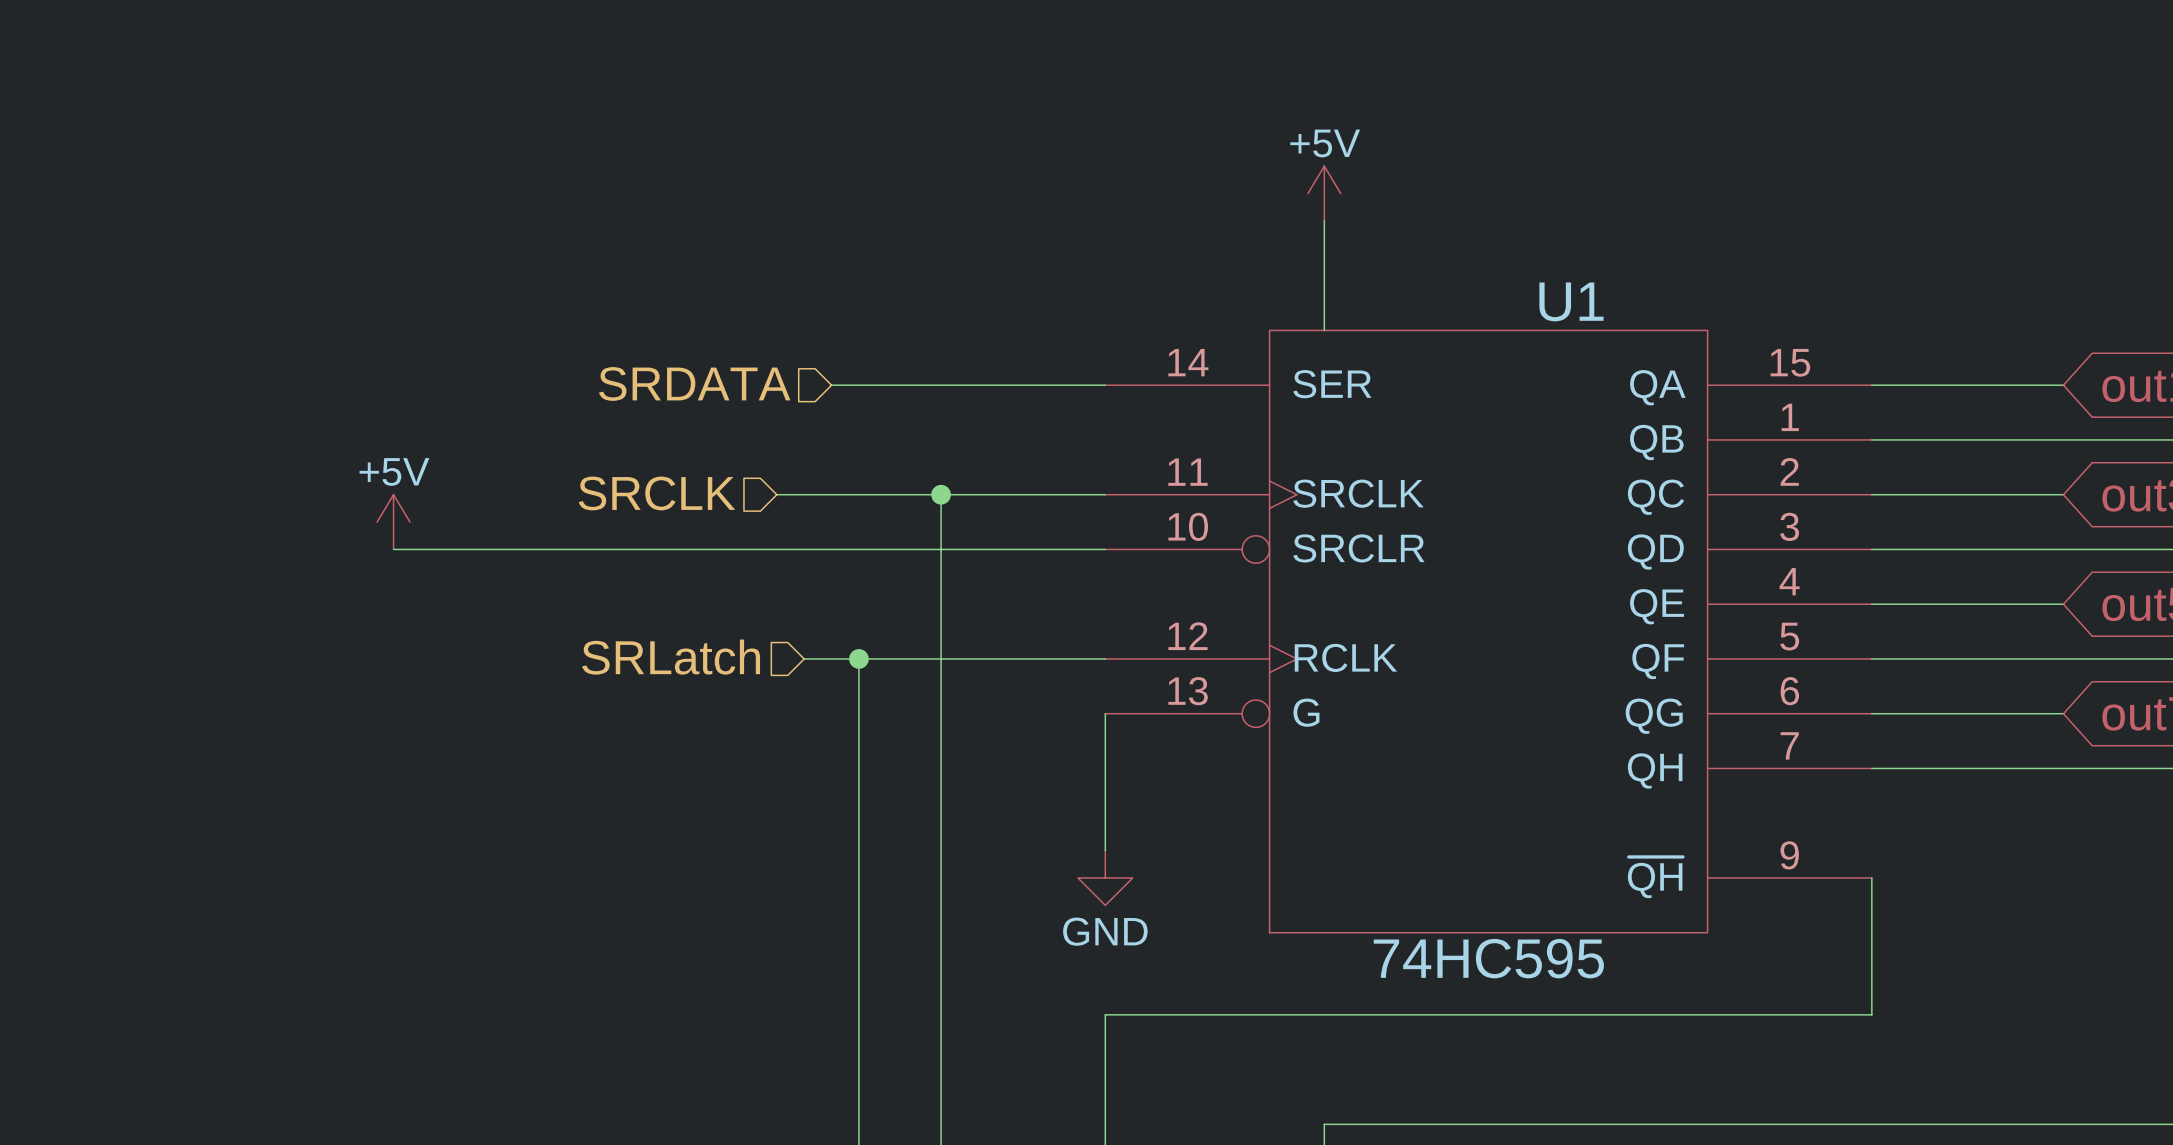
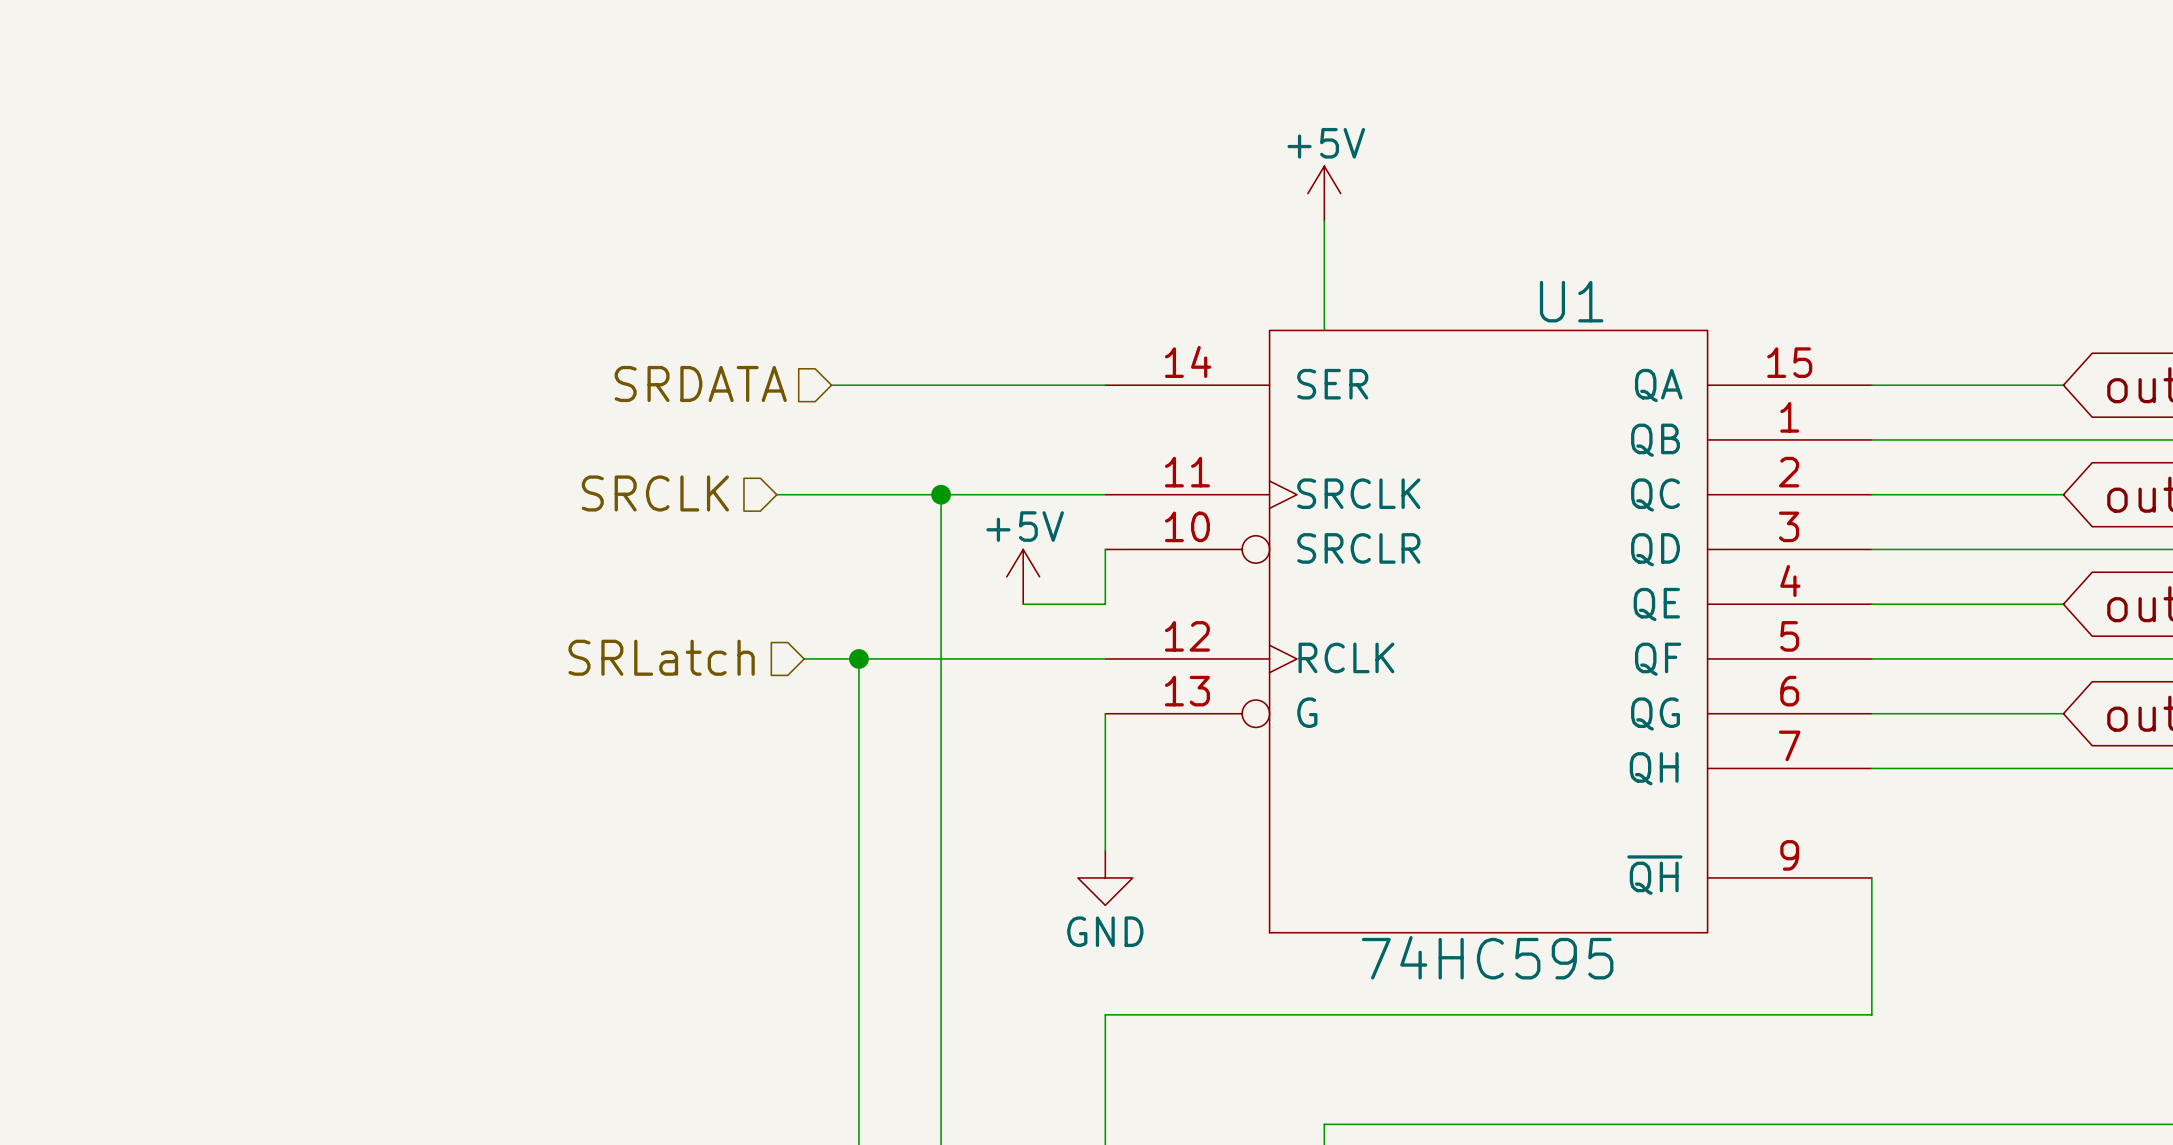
power symbol: +5V (393, 522) -> none
wire: (393, 549) (1105, 549) -> (1023, 604) (1105, 604) (1105, 549)
power symbol: none -> +5V (1023, 576)

